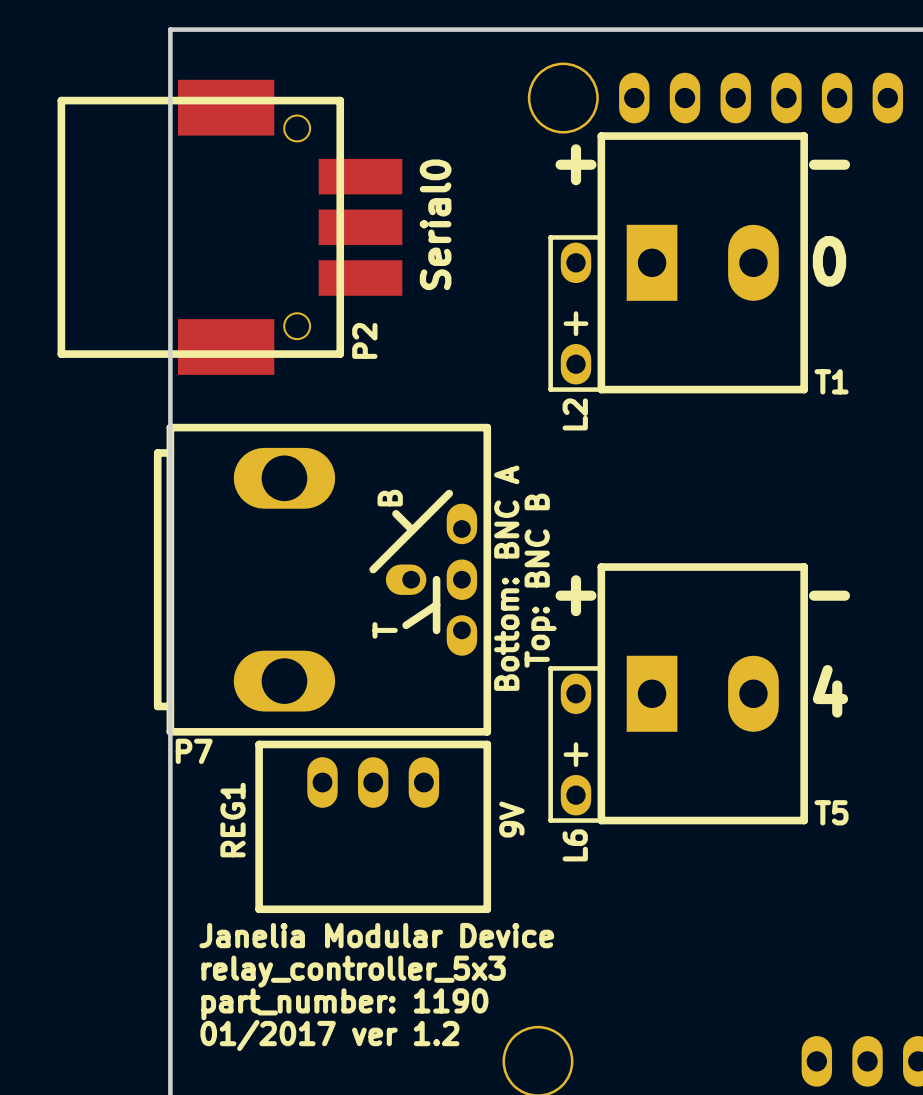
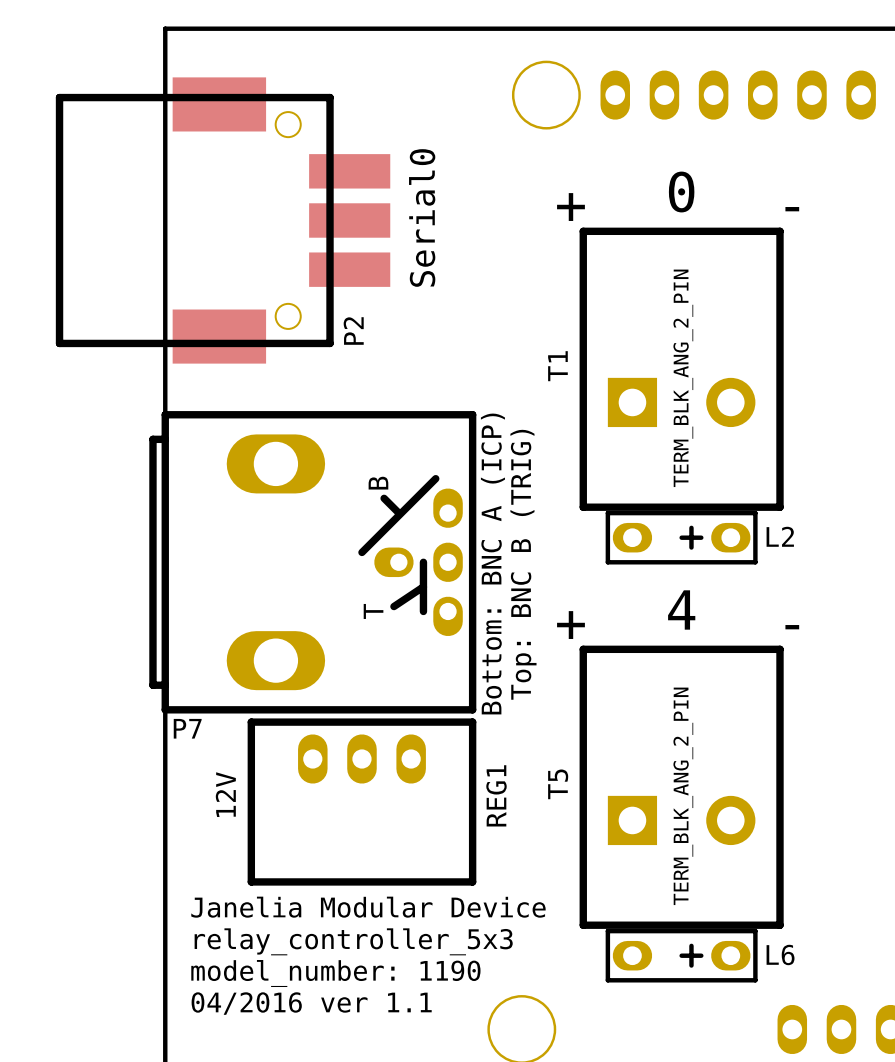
T1 footprint: [597, 132, 808, 394] -> [579, 227, 784, 511]
text position: + (576, 164) -> + (570, 207)
text position: - (829, 164) -> - (792, 209)
text position: 0 (829, 261) -> 0 (681, 192)
L2 rotation: 0° (576, 313) -> 90° counterclockwise (681, 537)
L2 position: (576, 313) -> (681, 537)
T1 name position: T1 (831, 381) -> T1 (557, 366)
T1 value: none -> TERM_BLK_ANG_2_PIN (683, 378)
T5 footprint: [597, 563, 808, 825] -> [579, 645, 784, 929]
P7 text: Bottom: BNC A (506, 578) -> Bottom: BNC A (ICP) (492, 564)
P7 text: Top: BNC B (540, 580) -> Top: BNC B (TRIG) (523, 564)
text position: + (576, 595) -> + (570, 625)
text position: - (829, 595) -> - (792, 627)
text position: 4 (830, 691) -> 4 (681, 609)
L6 rotation: 0° (576, 744) -> 90° counterclockwise (681, 955)
L6 position: (576, 744) -> (681, 955)
T5 name position: T5 (831, 812) -> T5 (558, 784)
text: none -> 12V (225, 794)
text: 9V (511, 819) -> none
REG1 name position: REG1 (233, 820) -> REG1 (496, 795)
T5 value: none -> TERM_BLK_ANG_2_PIN (683, 796)
text: part_number: 1190 (344, 1004) -> model_number: 1190 (335, 973)
text: 01/2017 ver 1.2 (329, 1035) -> 04/2016 ver 1.1 (311, 1003)

